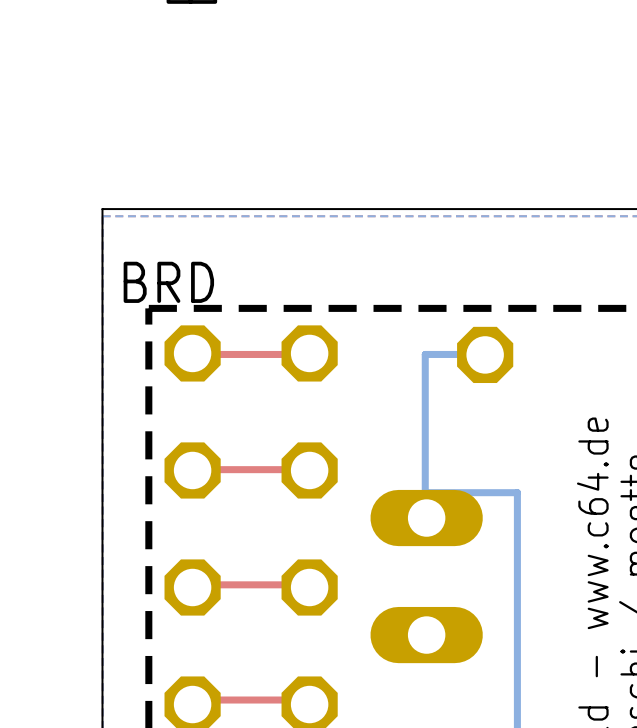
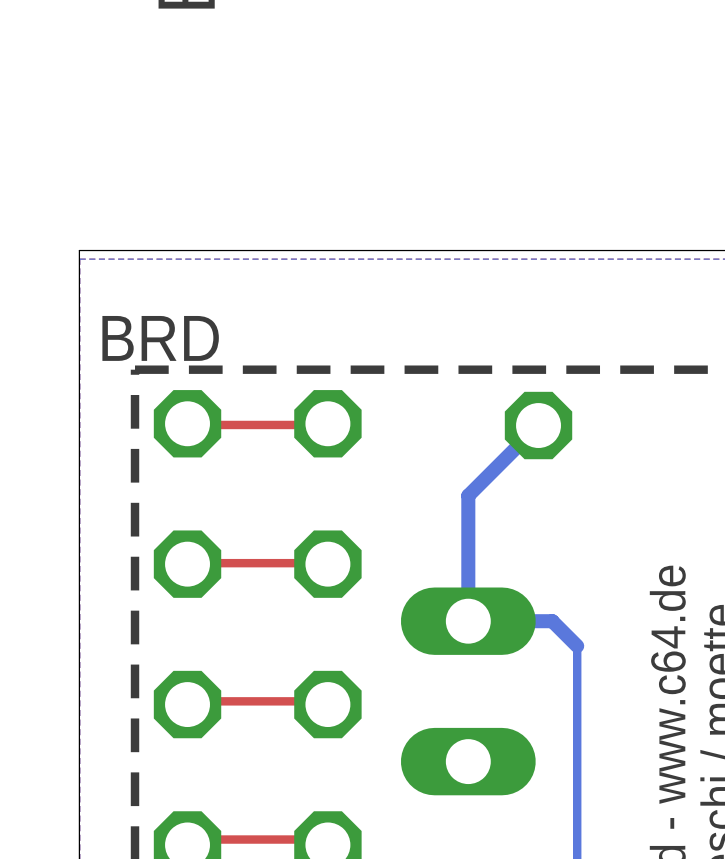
bottom track: (485, 354) (425, 354) (425, 515) (426, 518) (425, 492) (517, 492) (517, 538) -> (538, 425) (468, 495) (468, 621) (552, 621) (577, 646)

